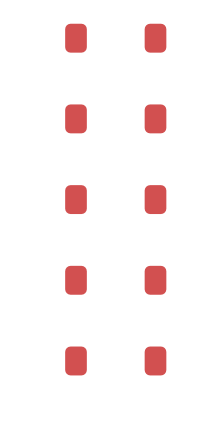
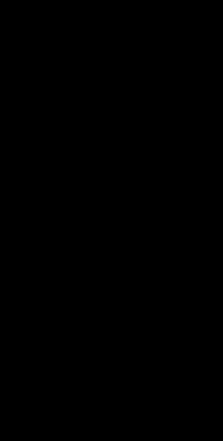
part: (115, 38) -> none
part: (115, 118) -> none
part: (115, 199) -> none
part: (115, 280) -> none
part: (115, 360) -> none

